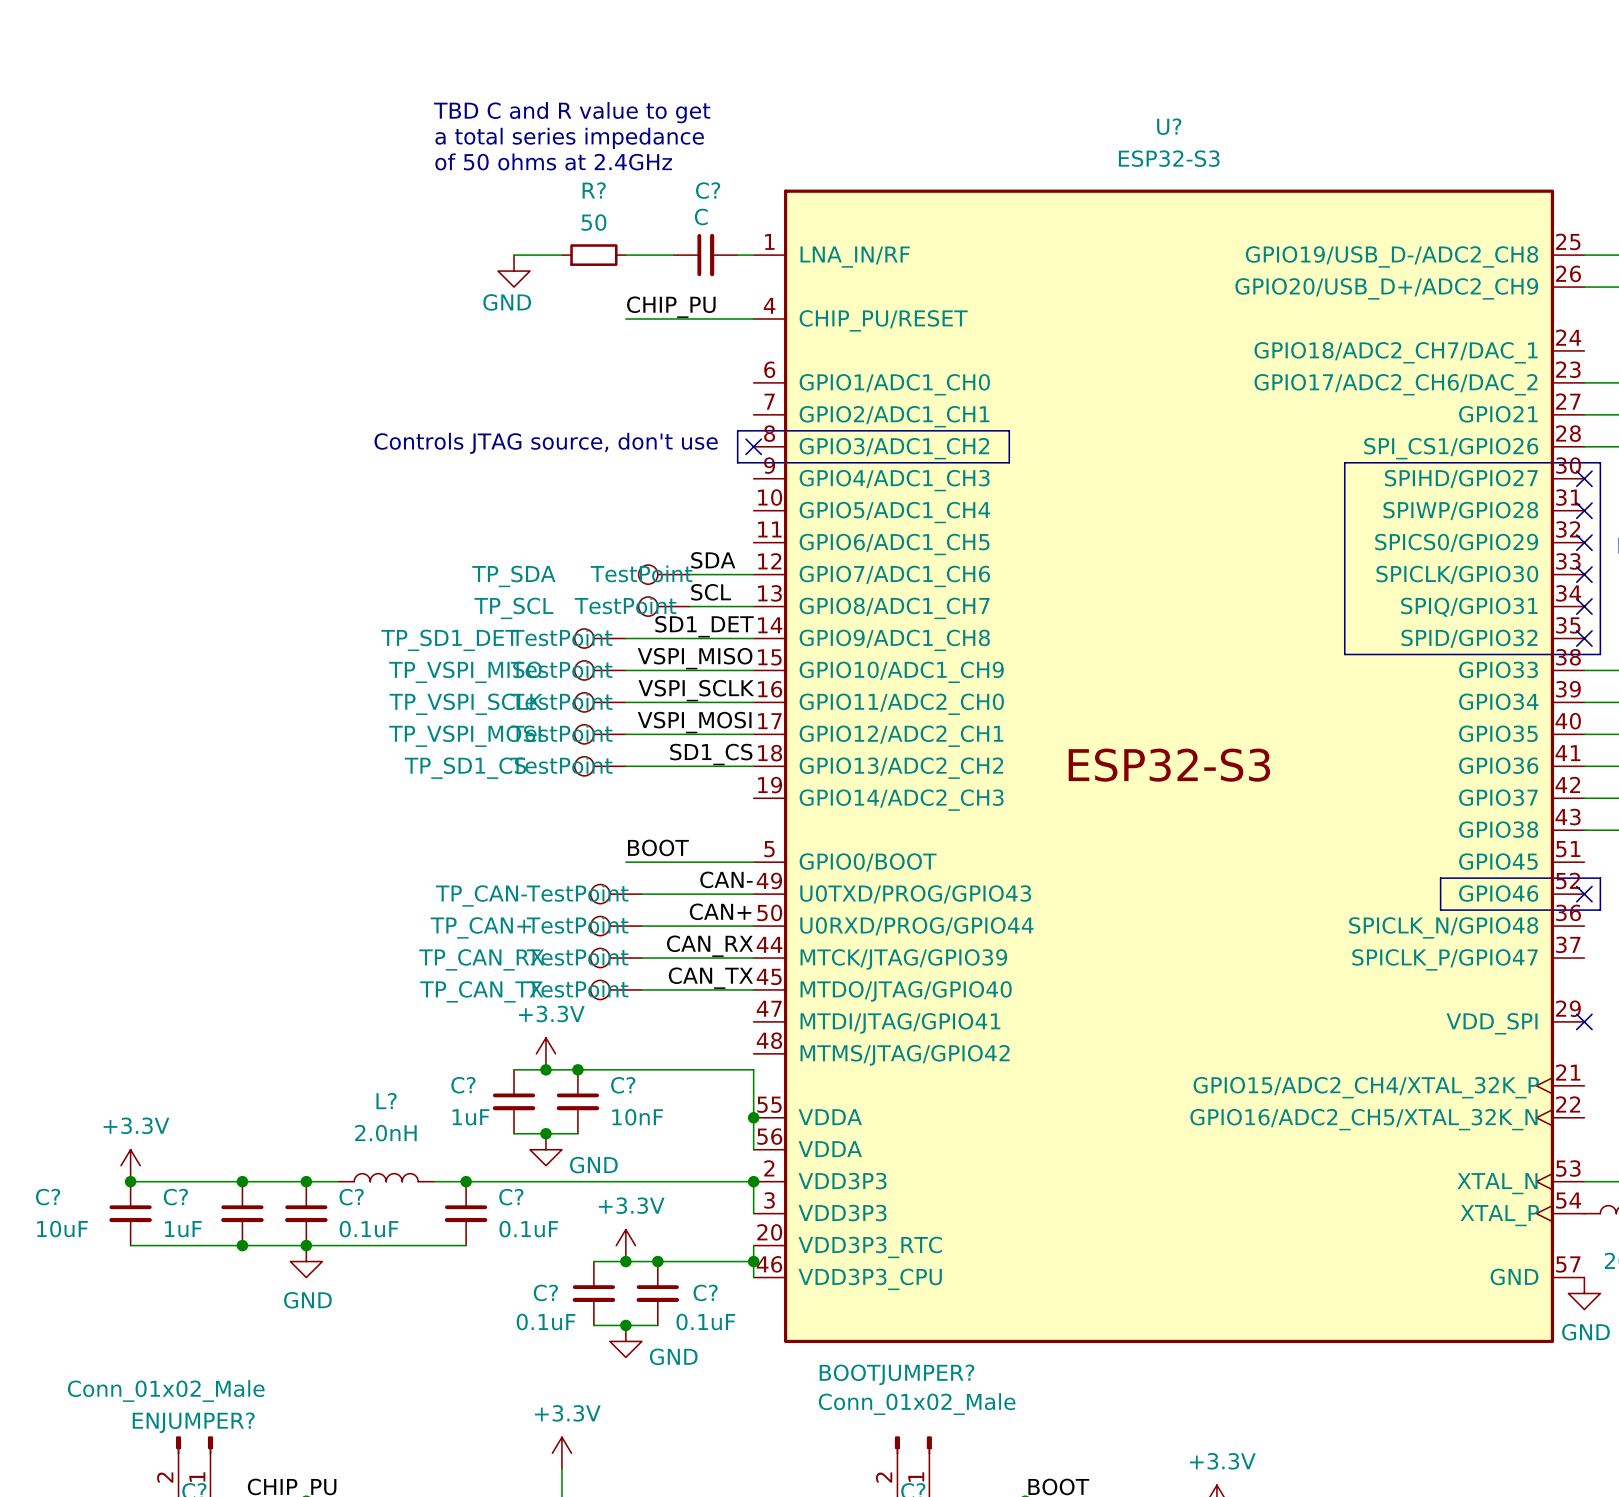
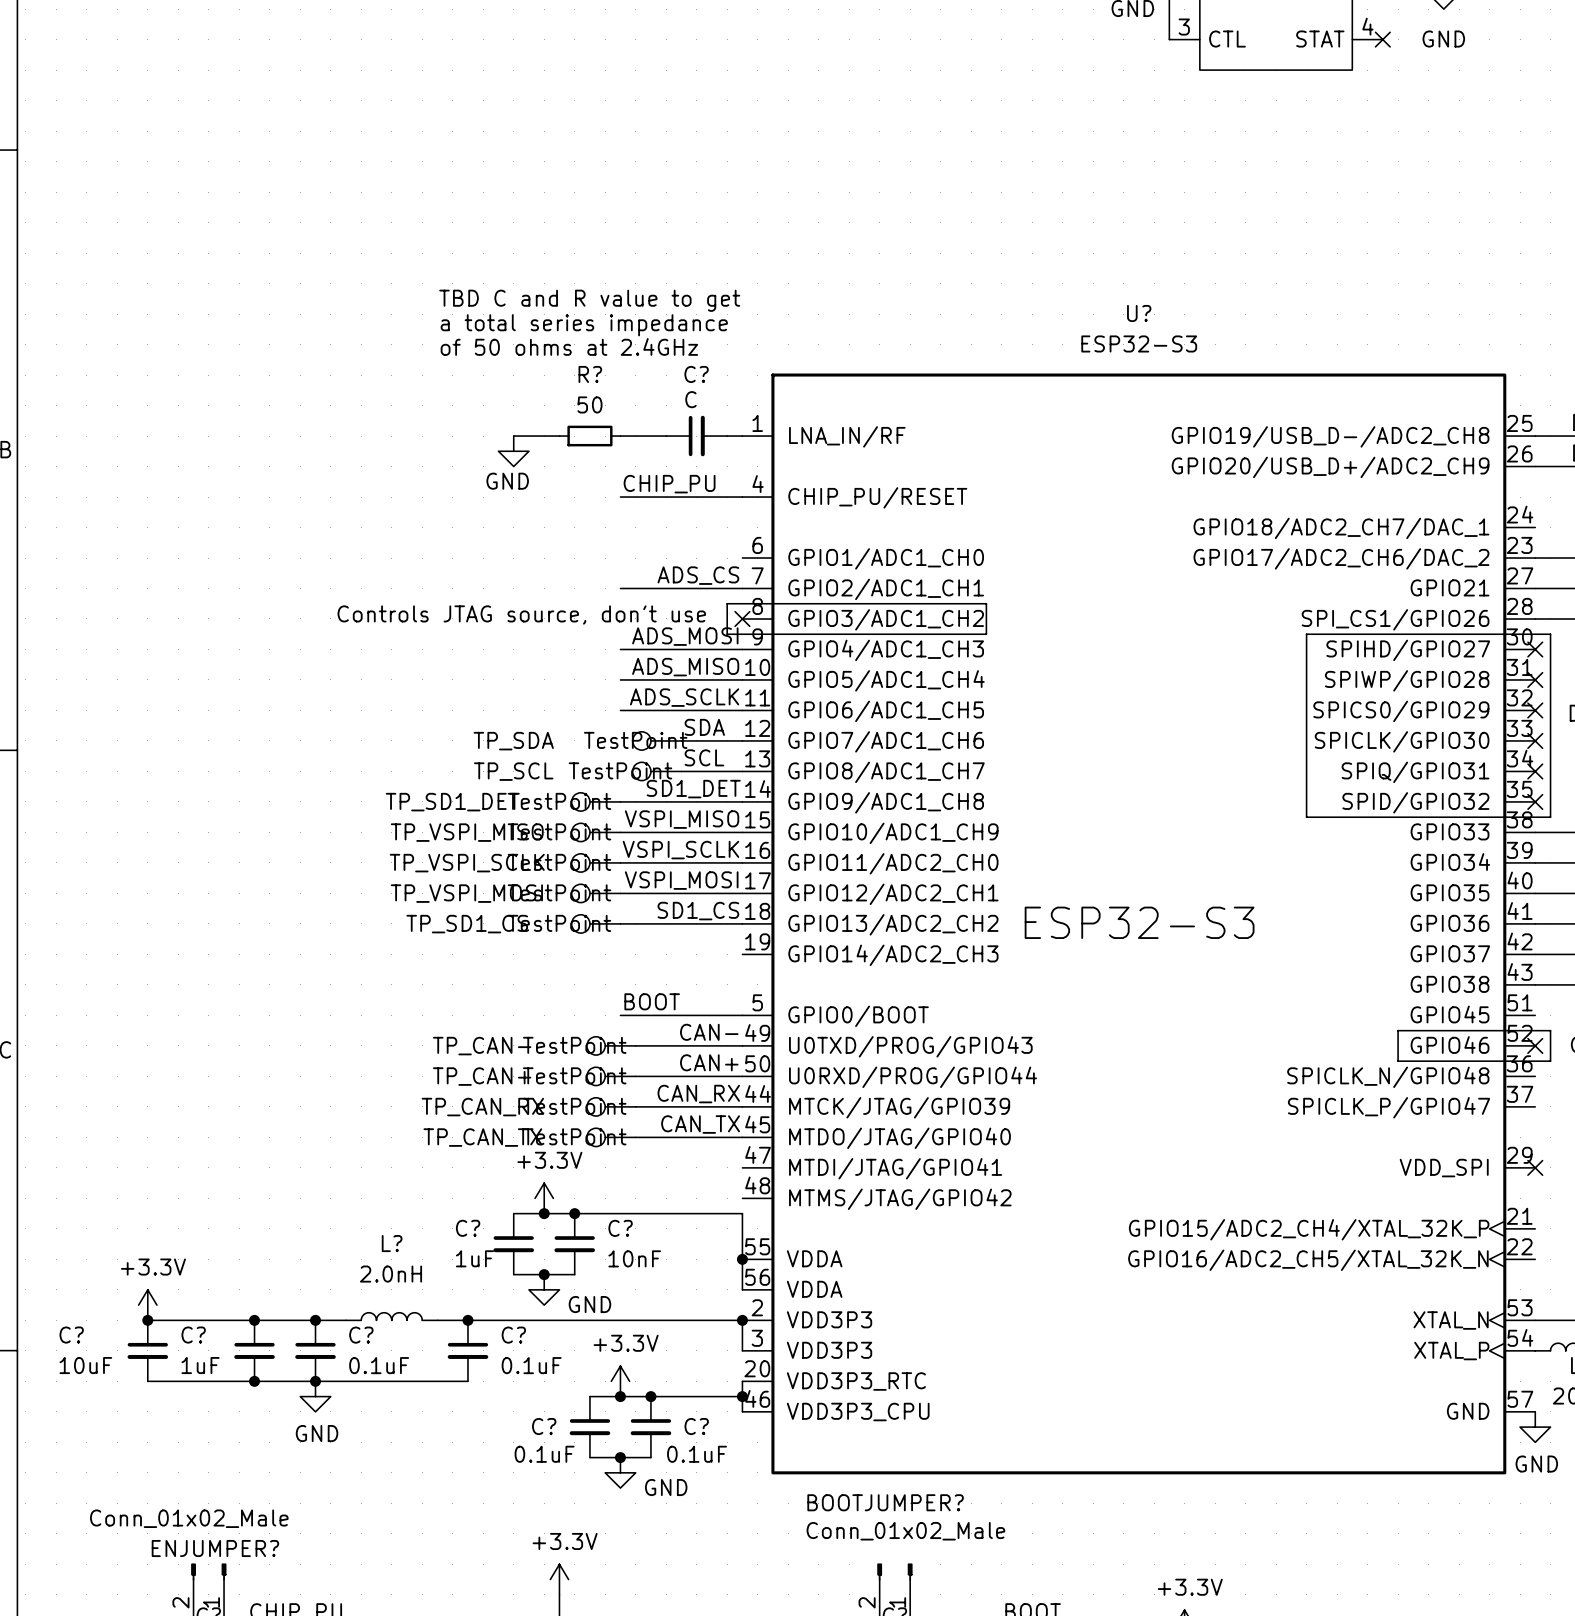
label: none -> ADS_CS (698, 575)
wire: none -> (620, 588) (742, 588)
label: none -> ADS_MOSI (685, 636)
wire: none -> (620, 649) (742, 649)
label: none -> ADS_MISO (685, 667)
wire: none -> (620, 679) (742, 679)
label: none -> ADS_SCLK (684, 697)
wire: none -> (620, 710) (742, 710)

